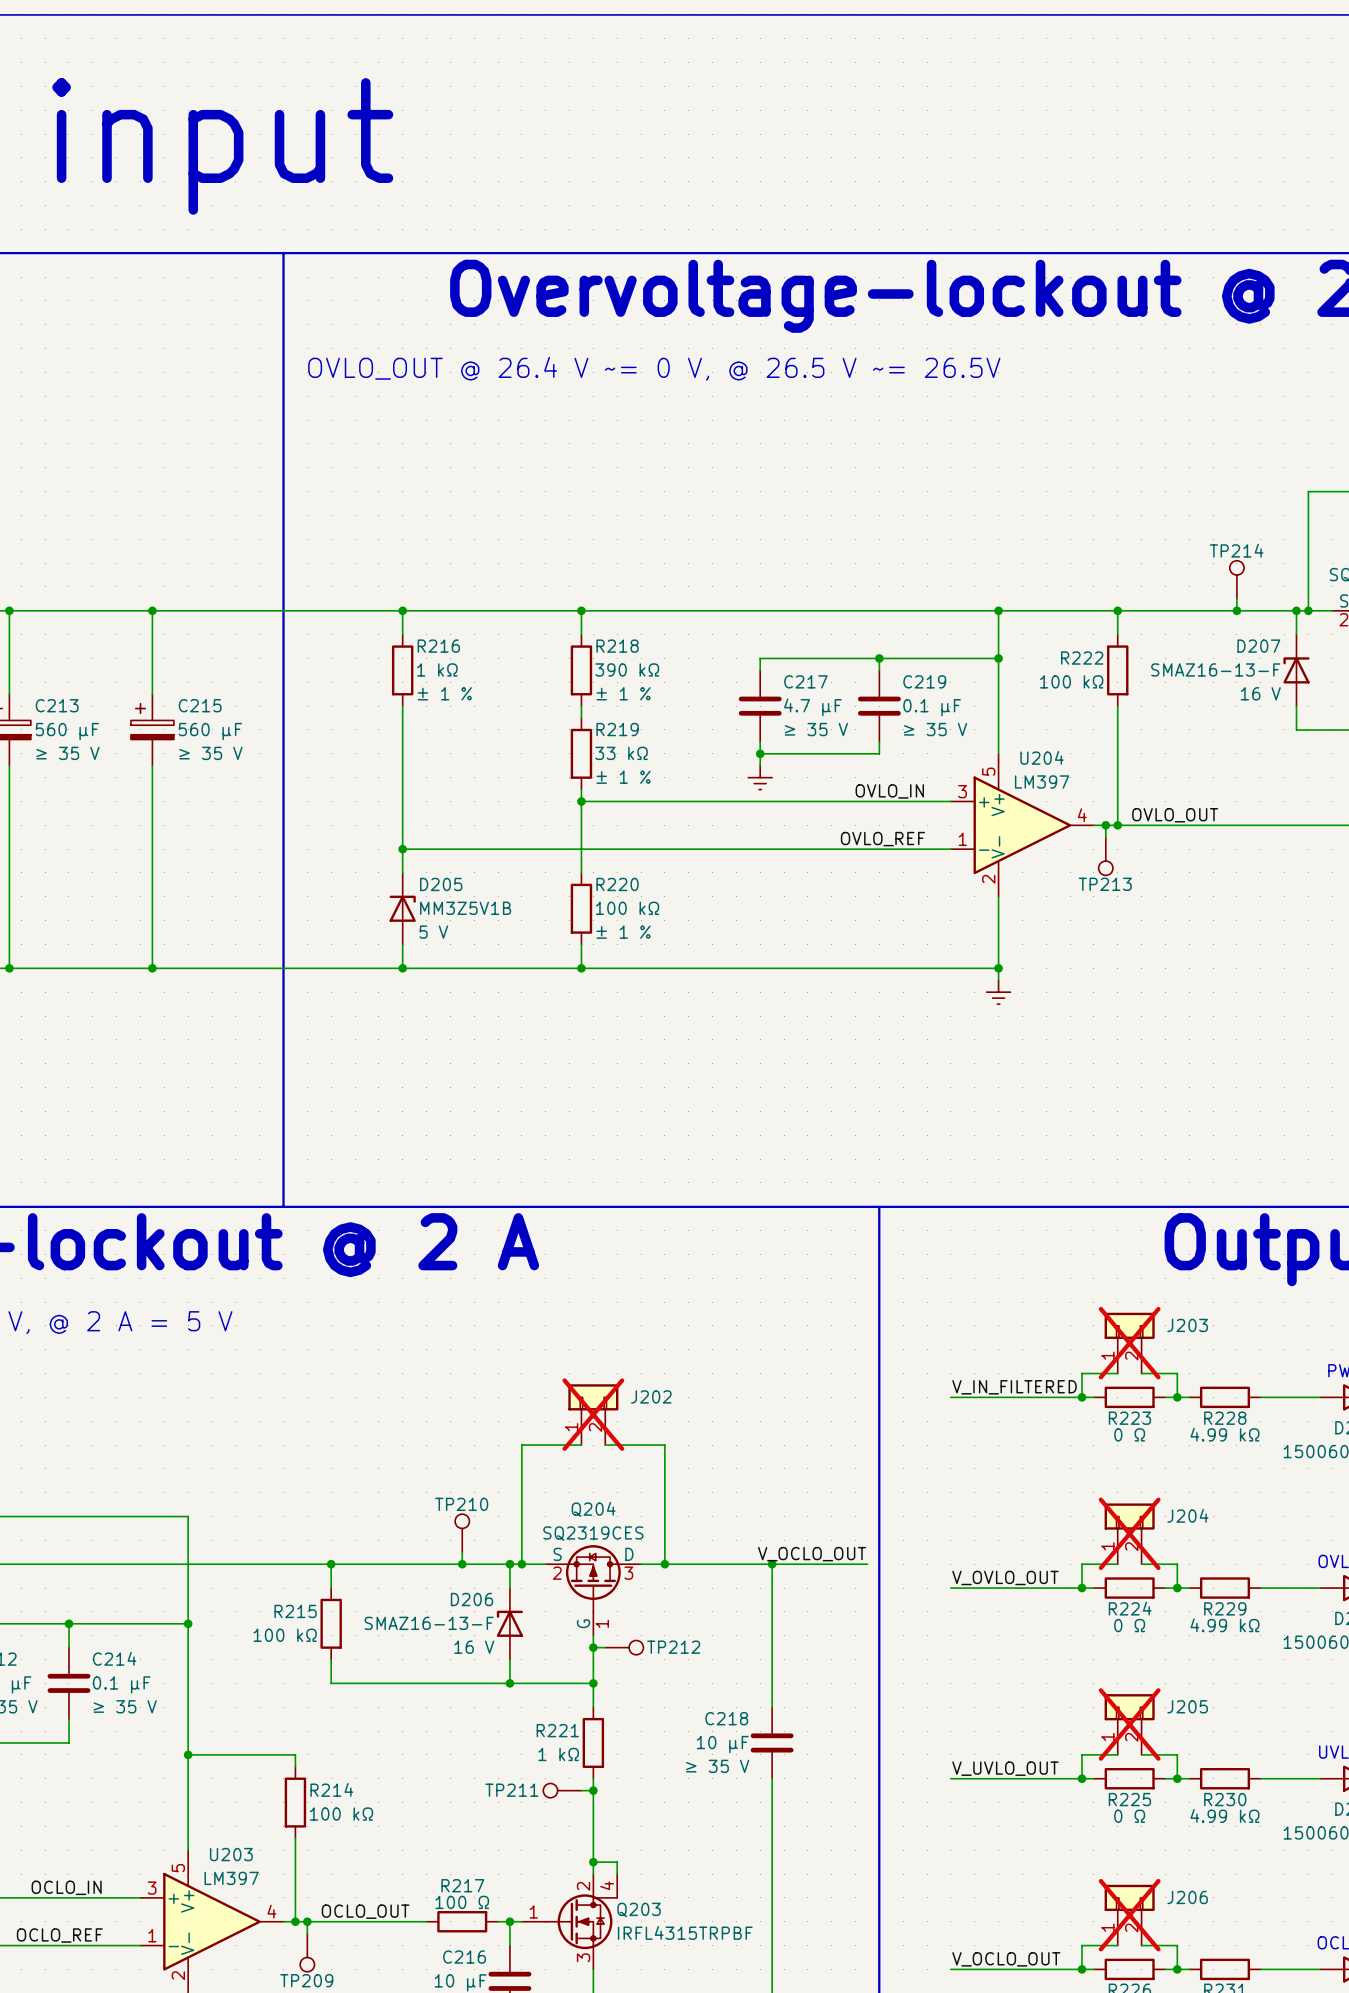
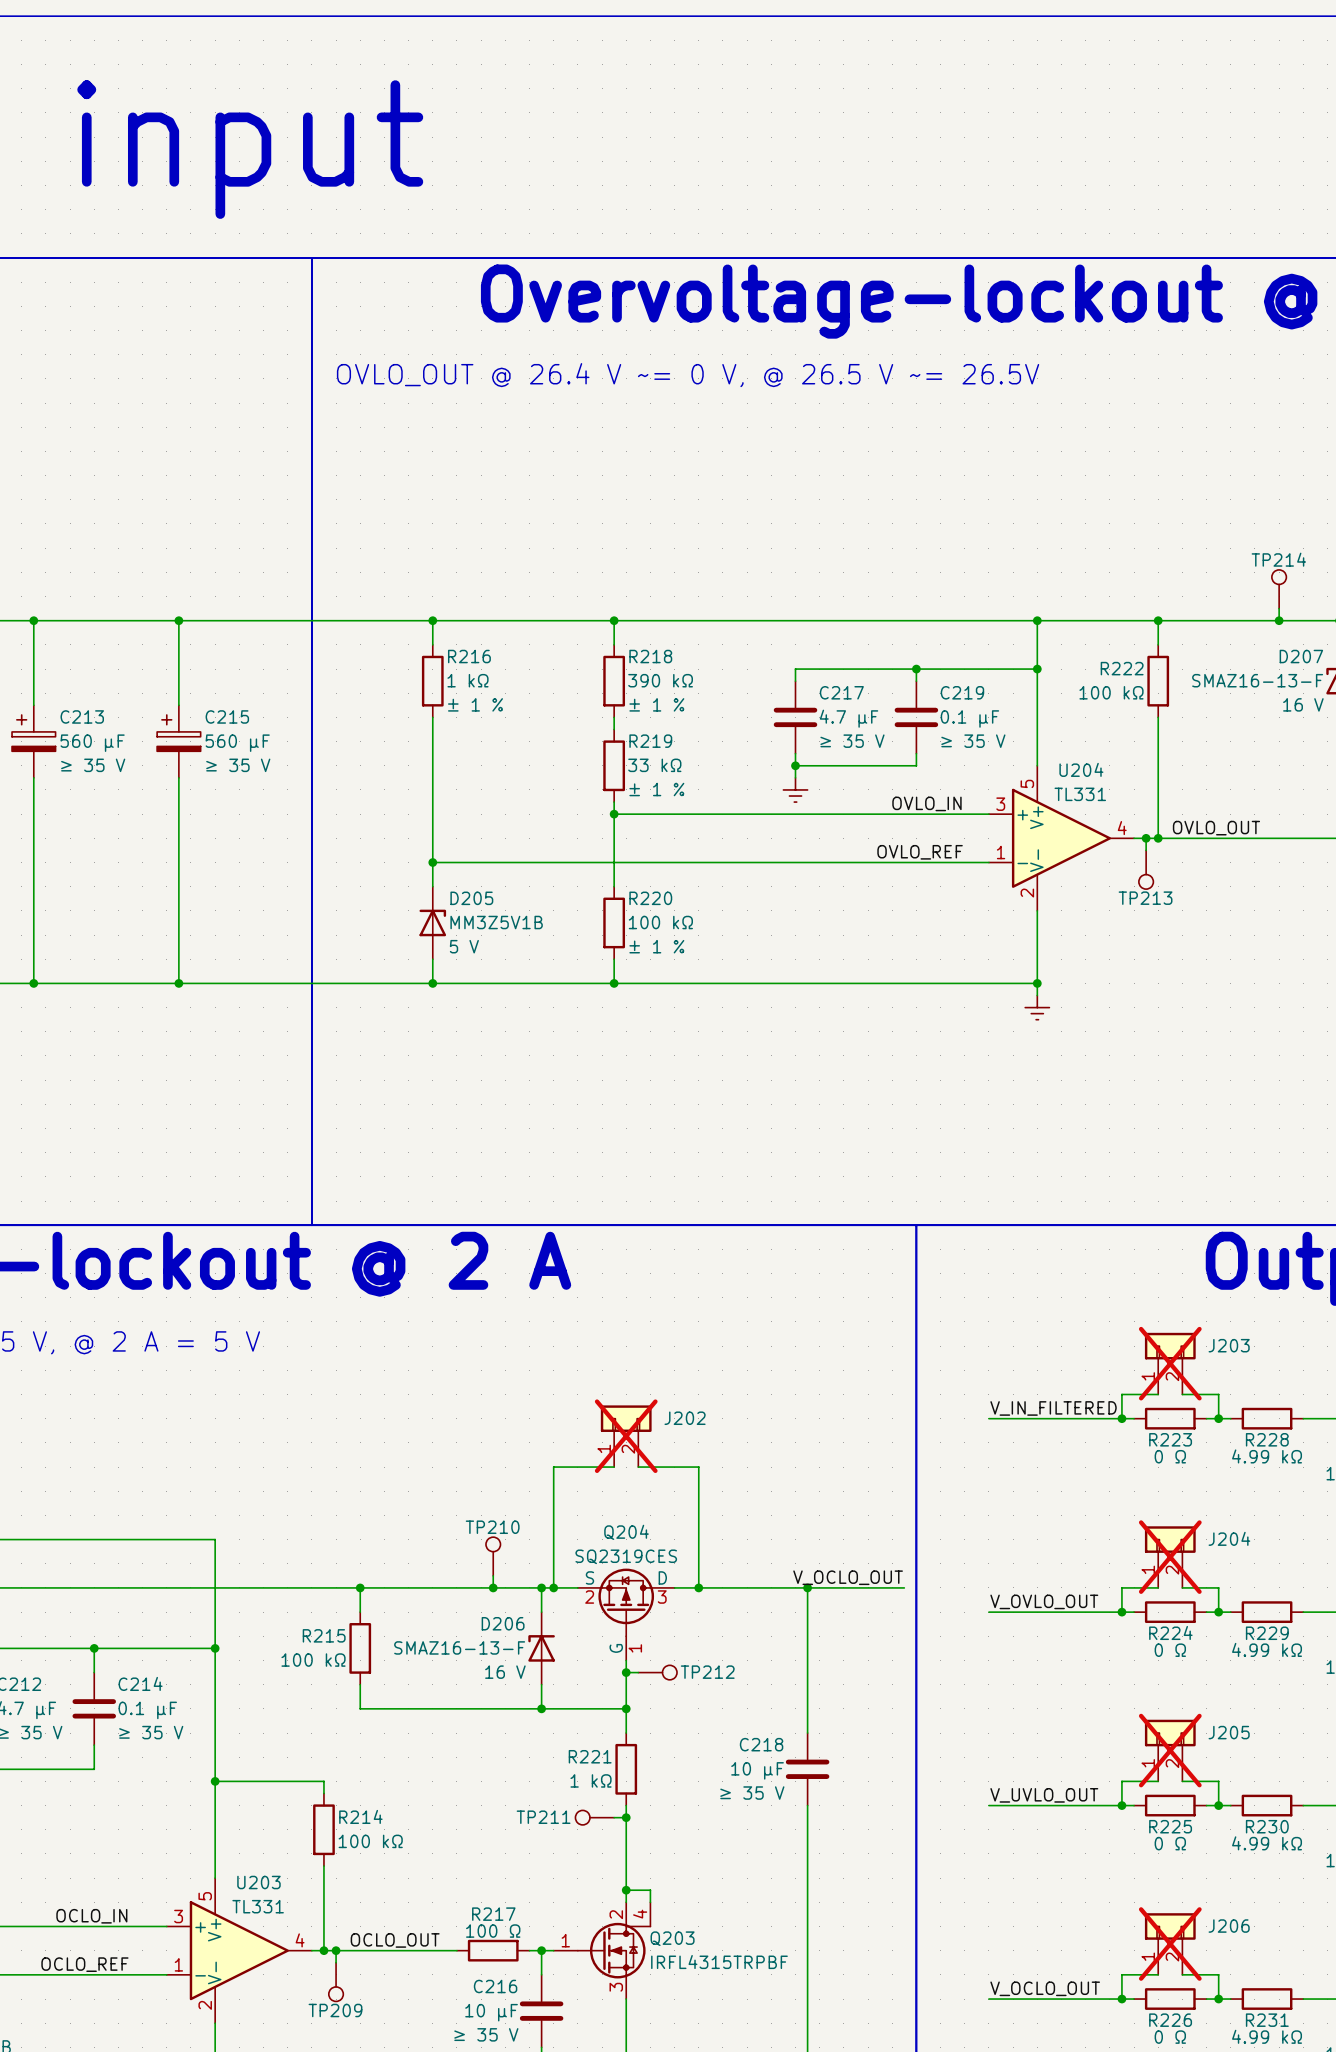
U204 value: LM397 (1042, 781) -> TL331 (1080, 794)
U203 value: LM397 (231, 1878) -> TL331 (258, 1906)

